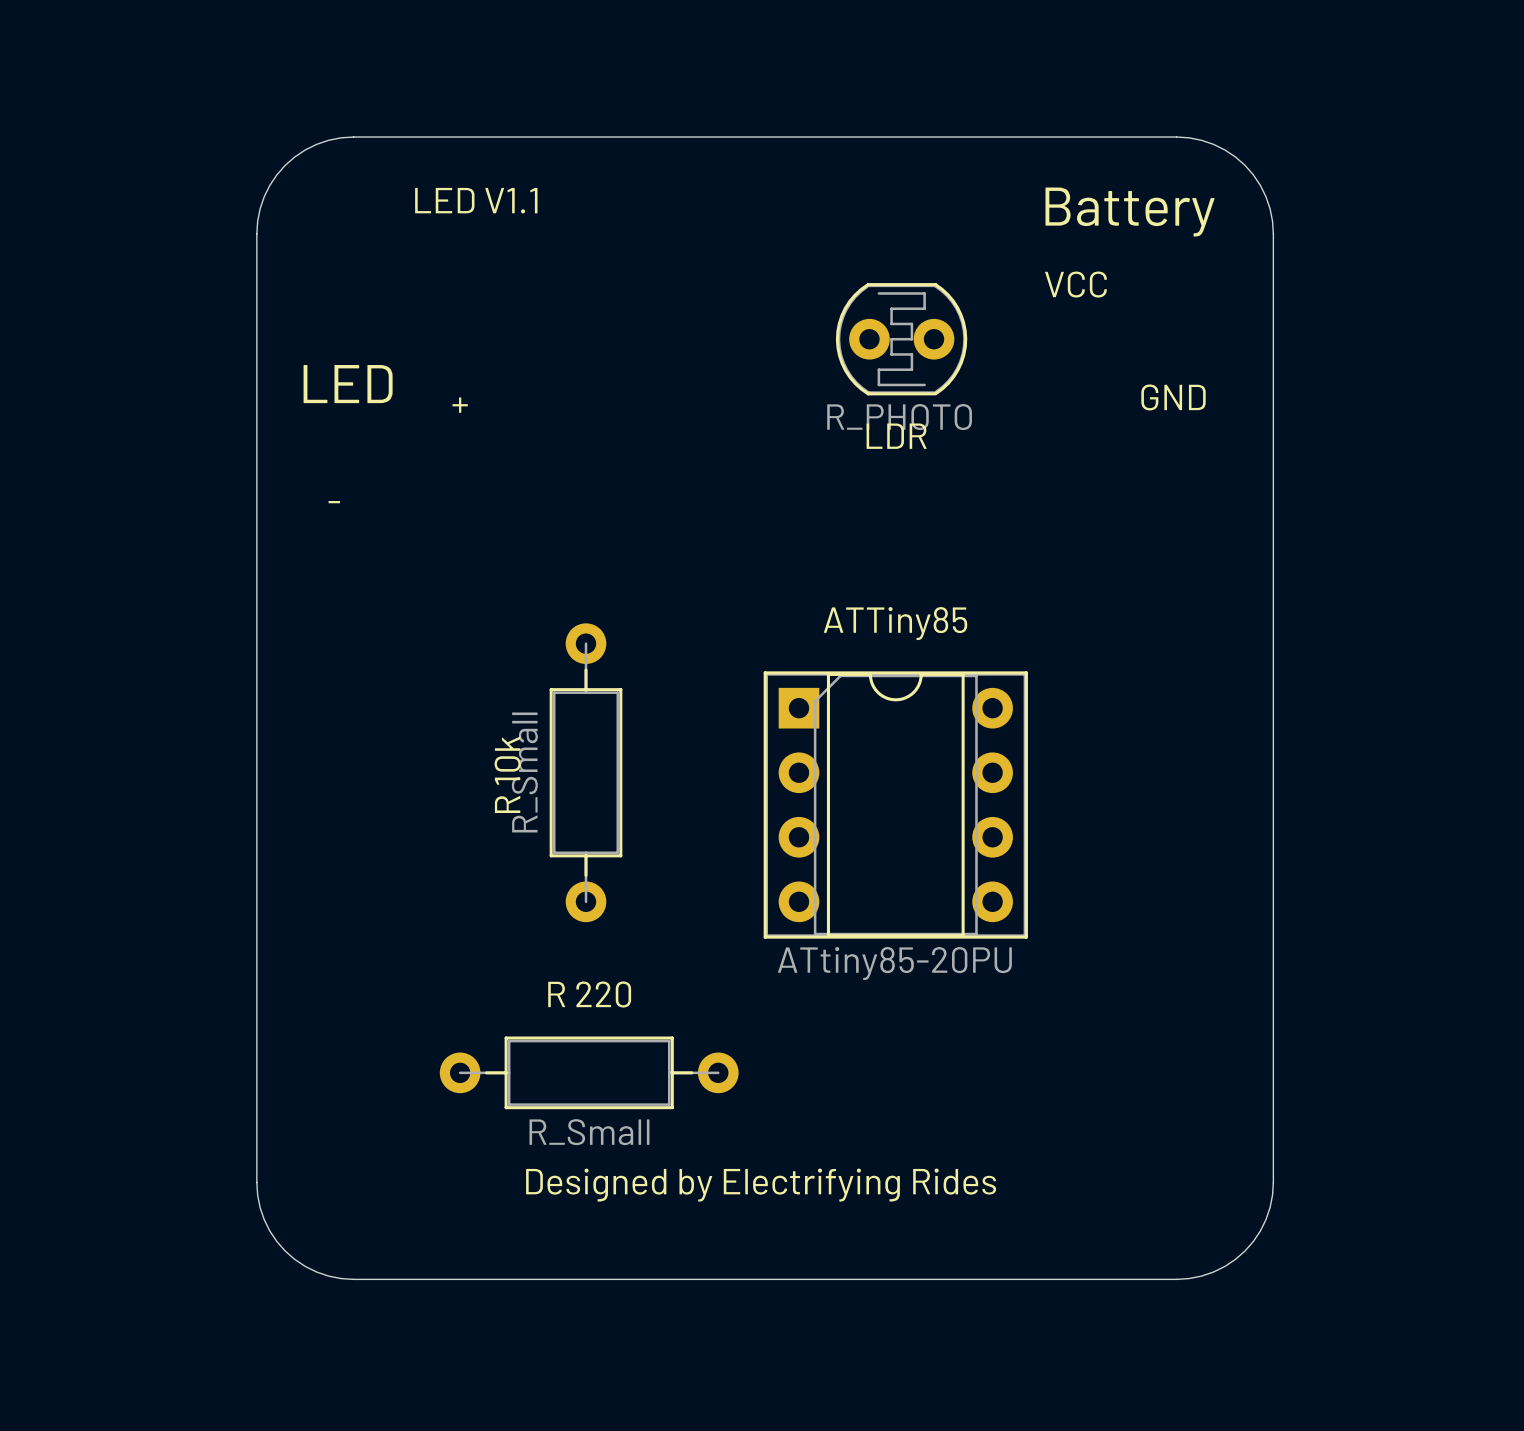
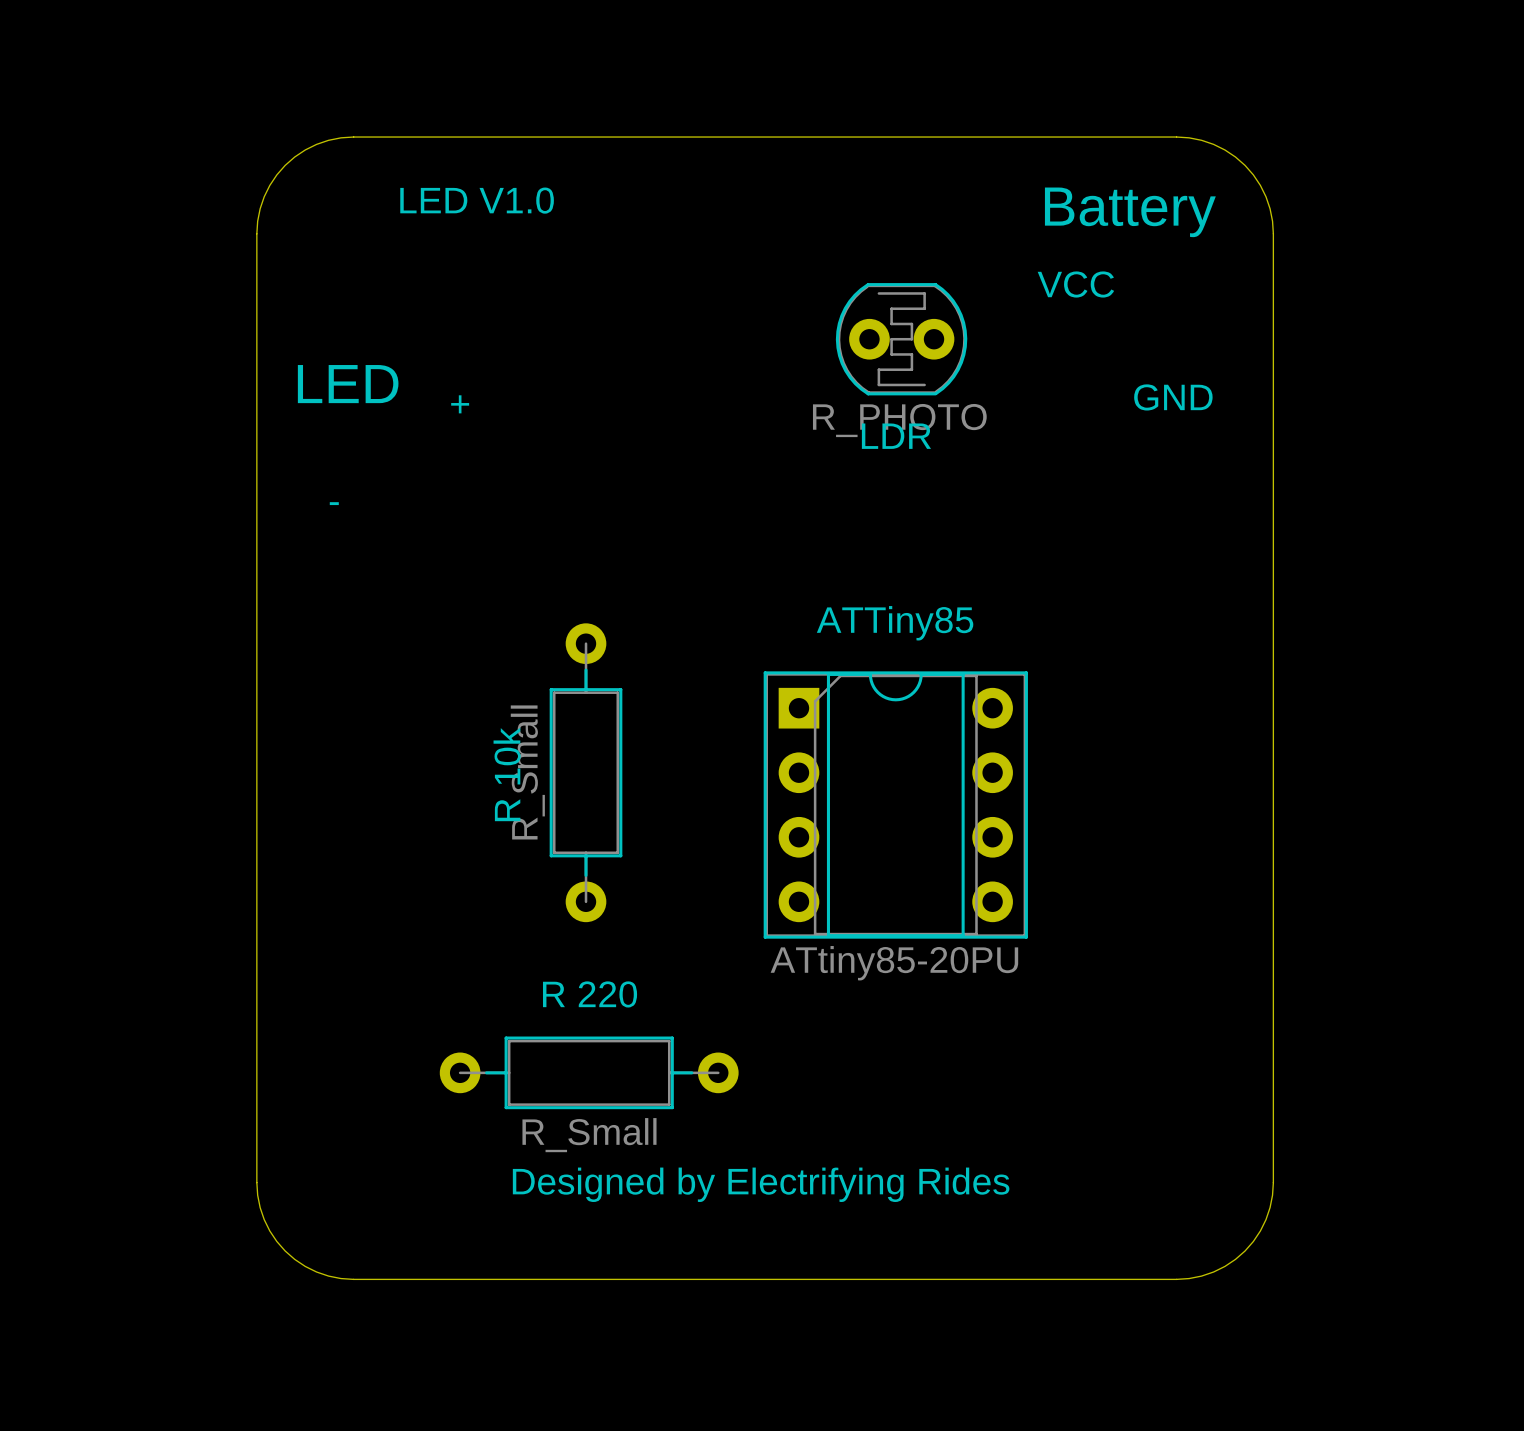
text: LED V1.1 (476, 200) -> LED V1.0 (477, 200)

